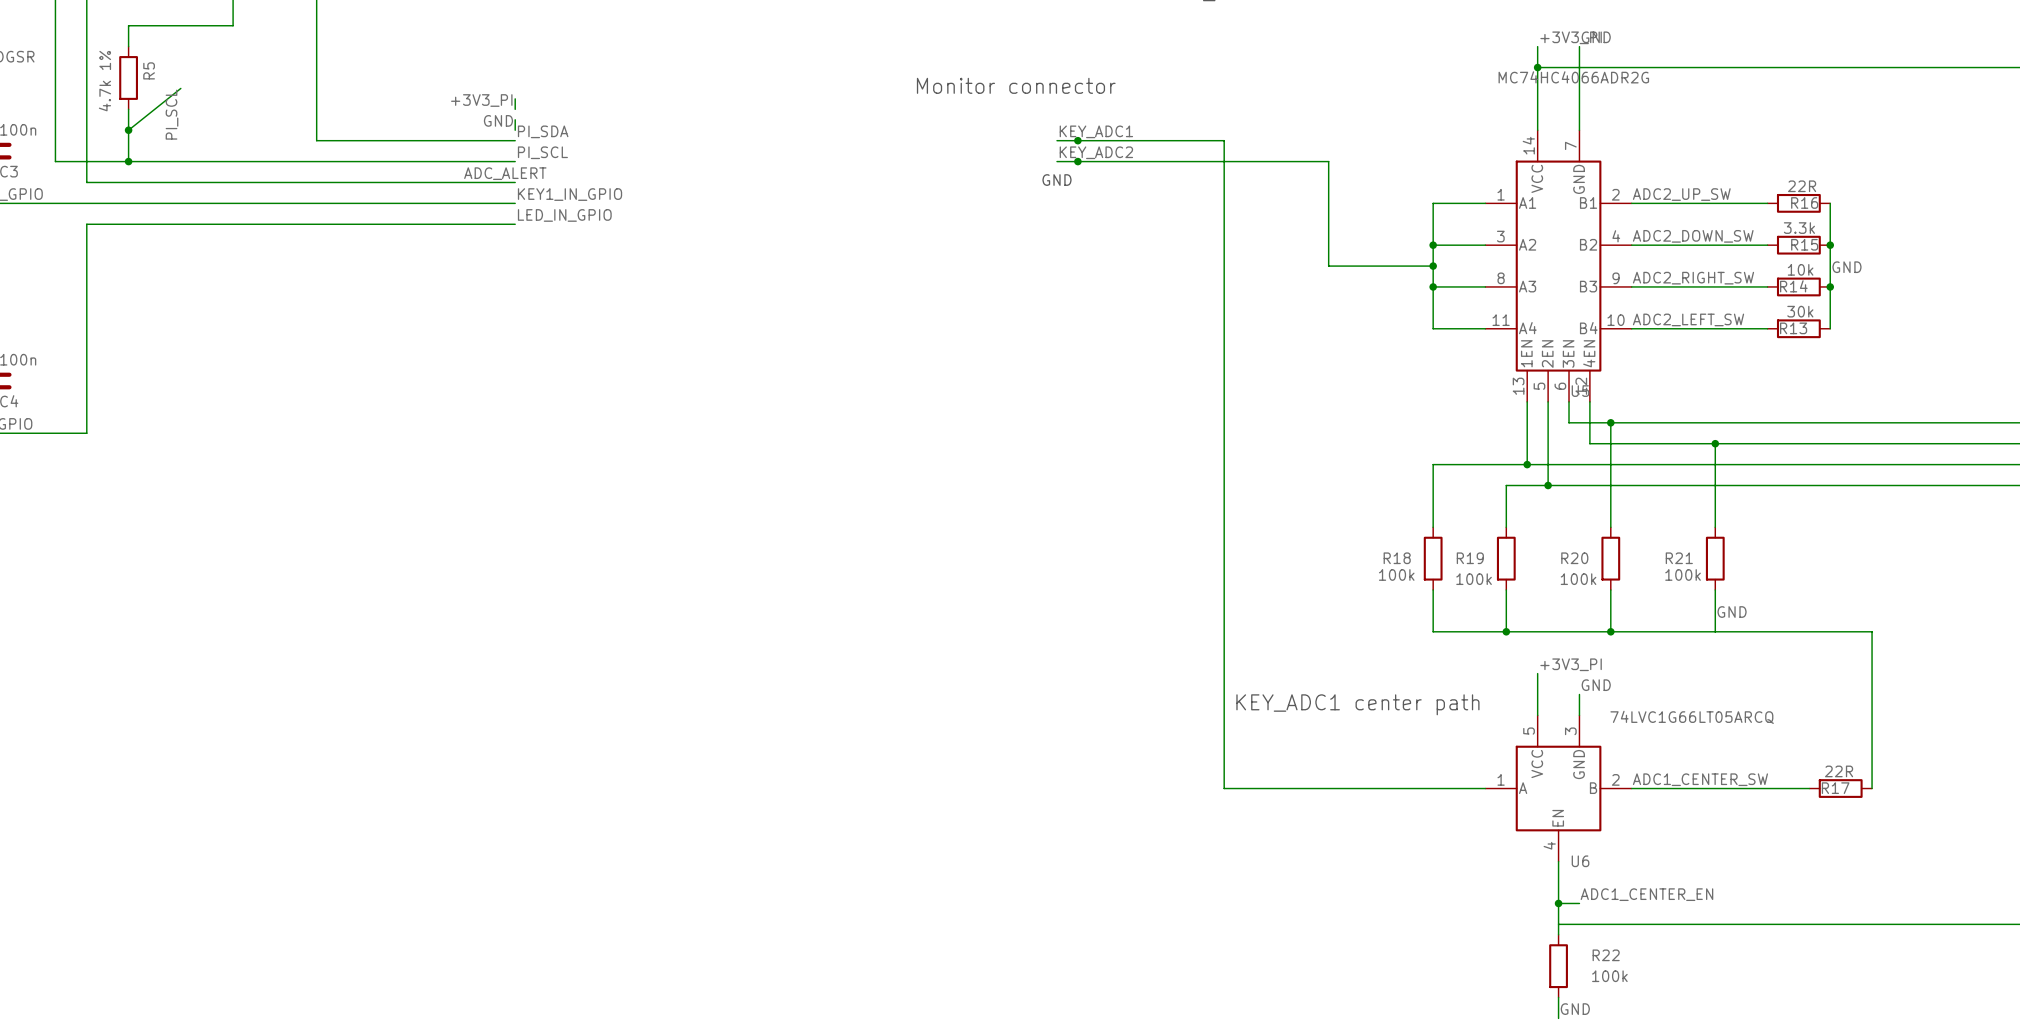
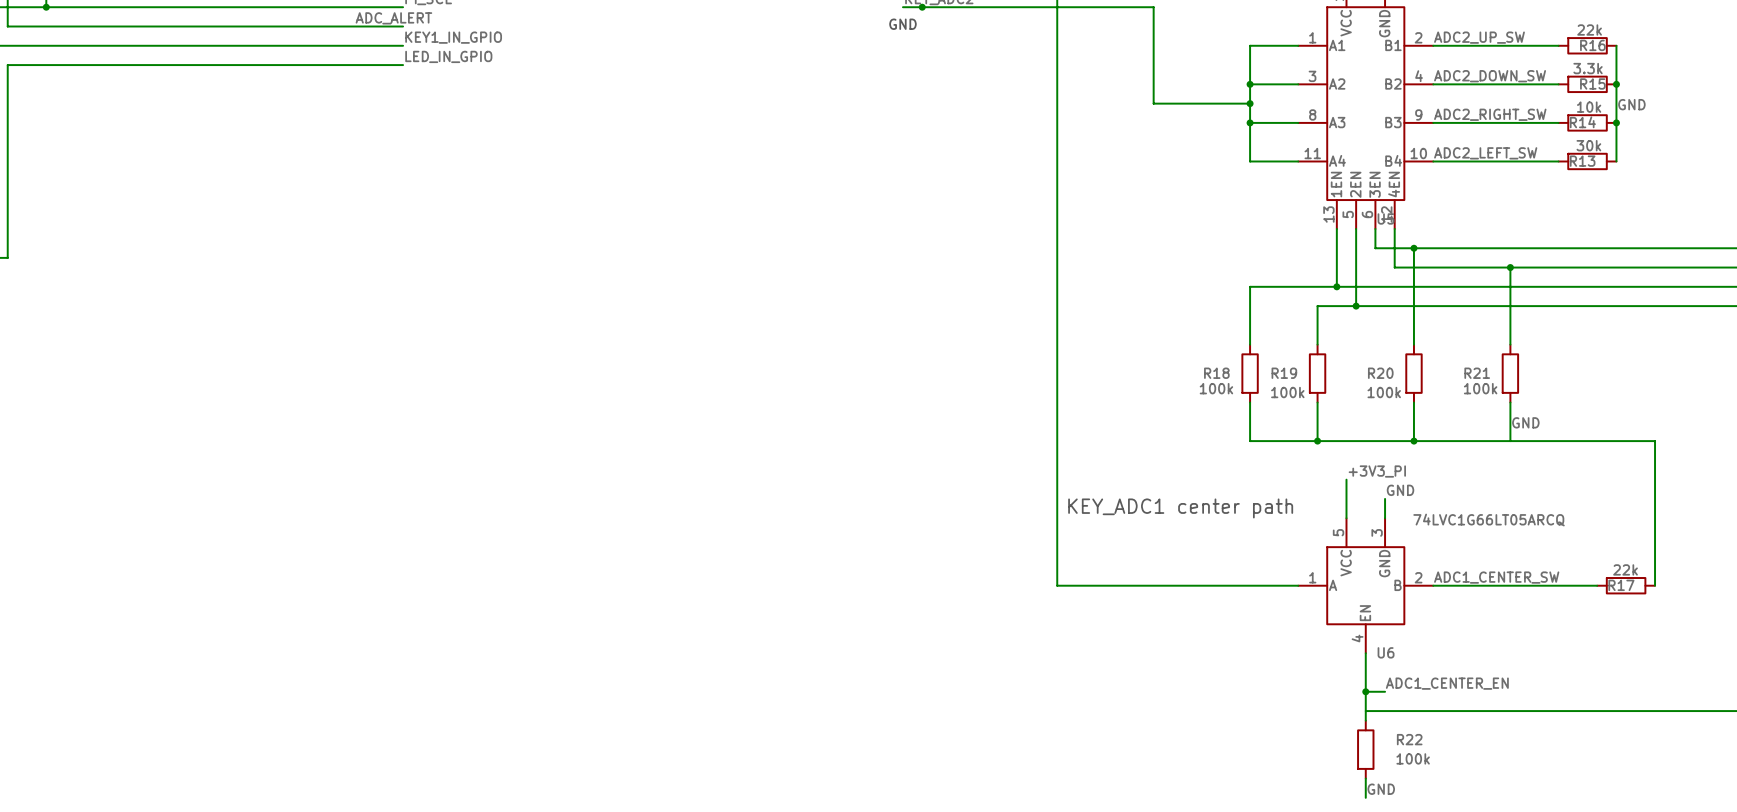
R16 value: 22R (1802, 186) -> 22k (1589, 29)
R17 value: 22R (1839, 771) -> 22k (1625, 569)

